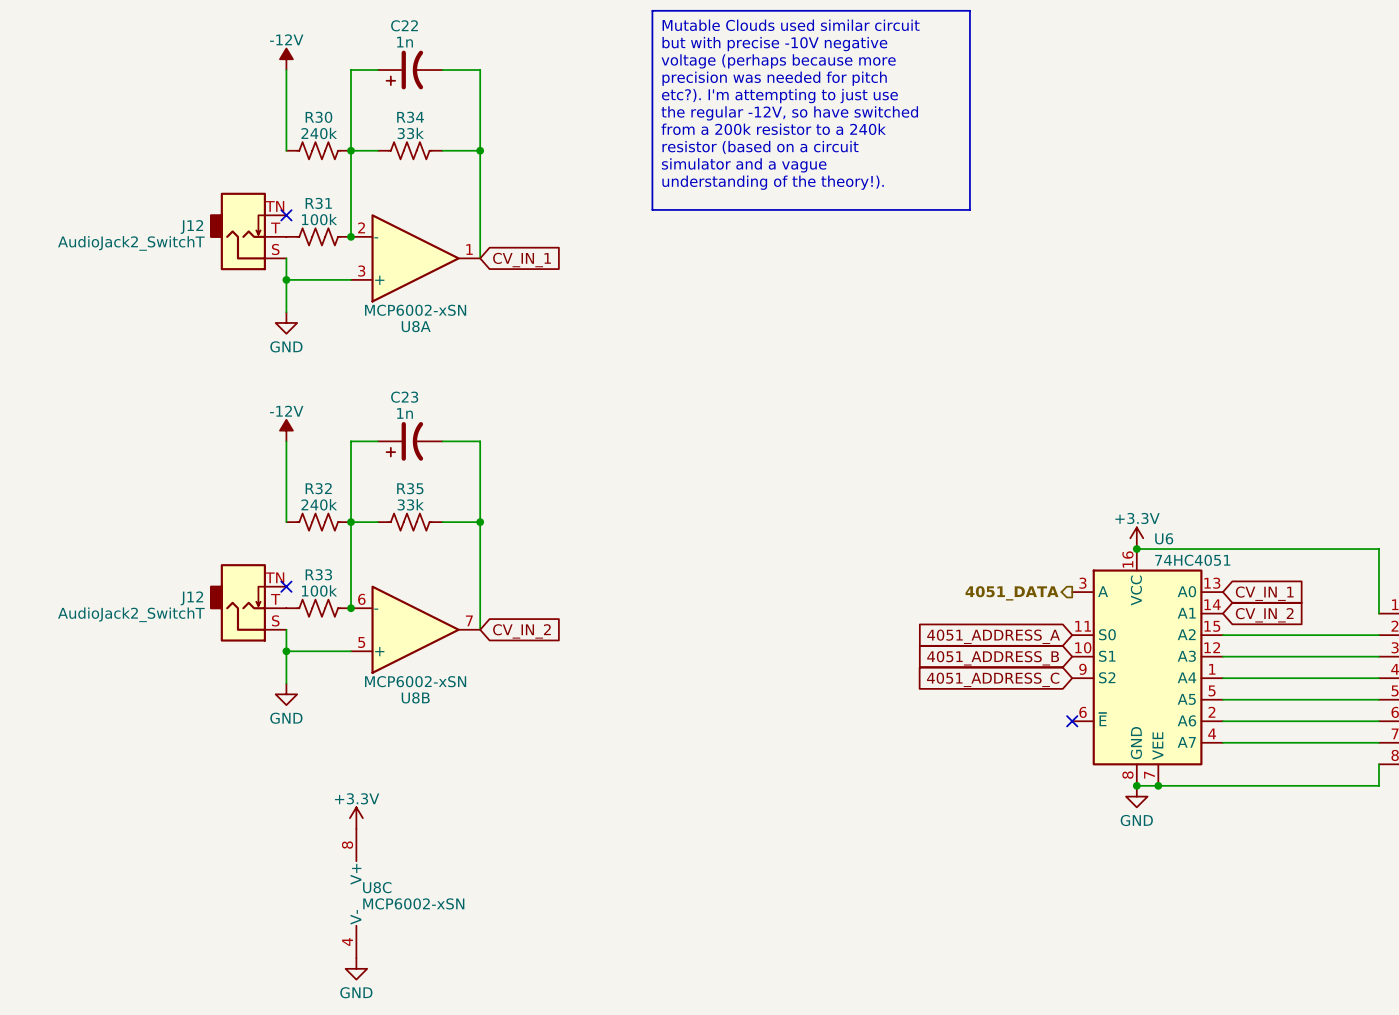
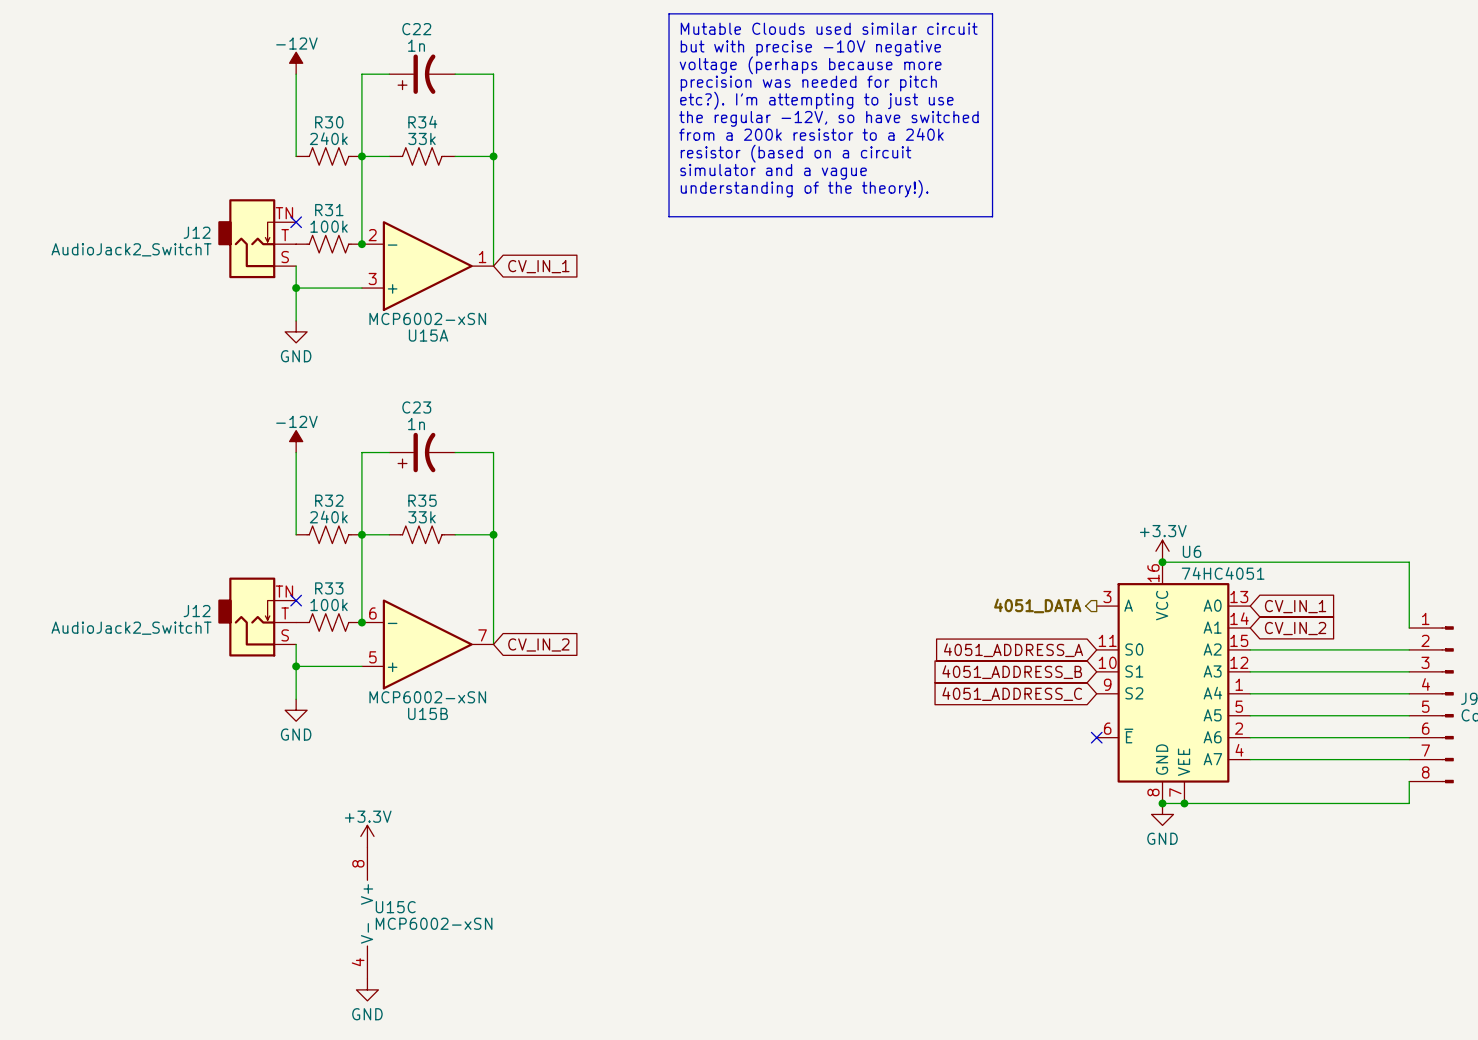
U8A name: U8A (416, 326) -> U15A (428, 335)
U8B name: U8B (415, 697) -> U15B (428, 713)
U8C name: U8C (377, 887) -> U15C (395, 907)

